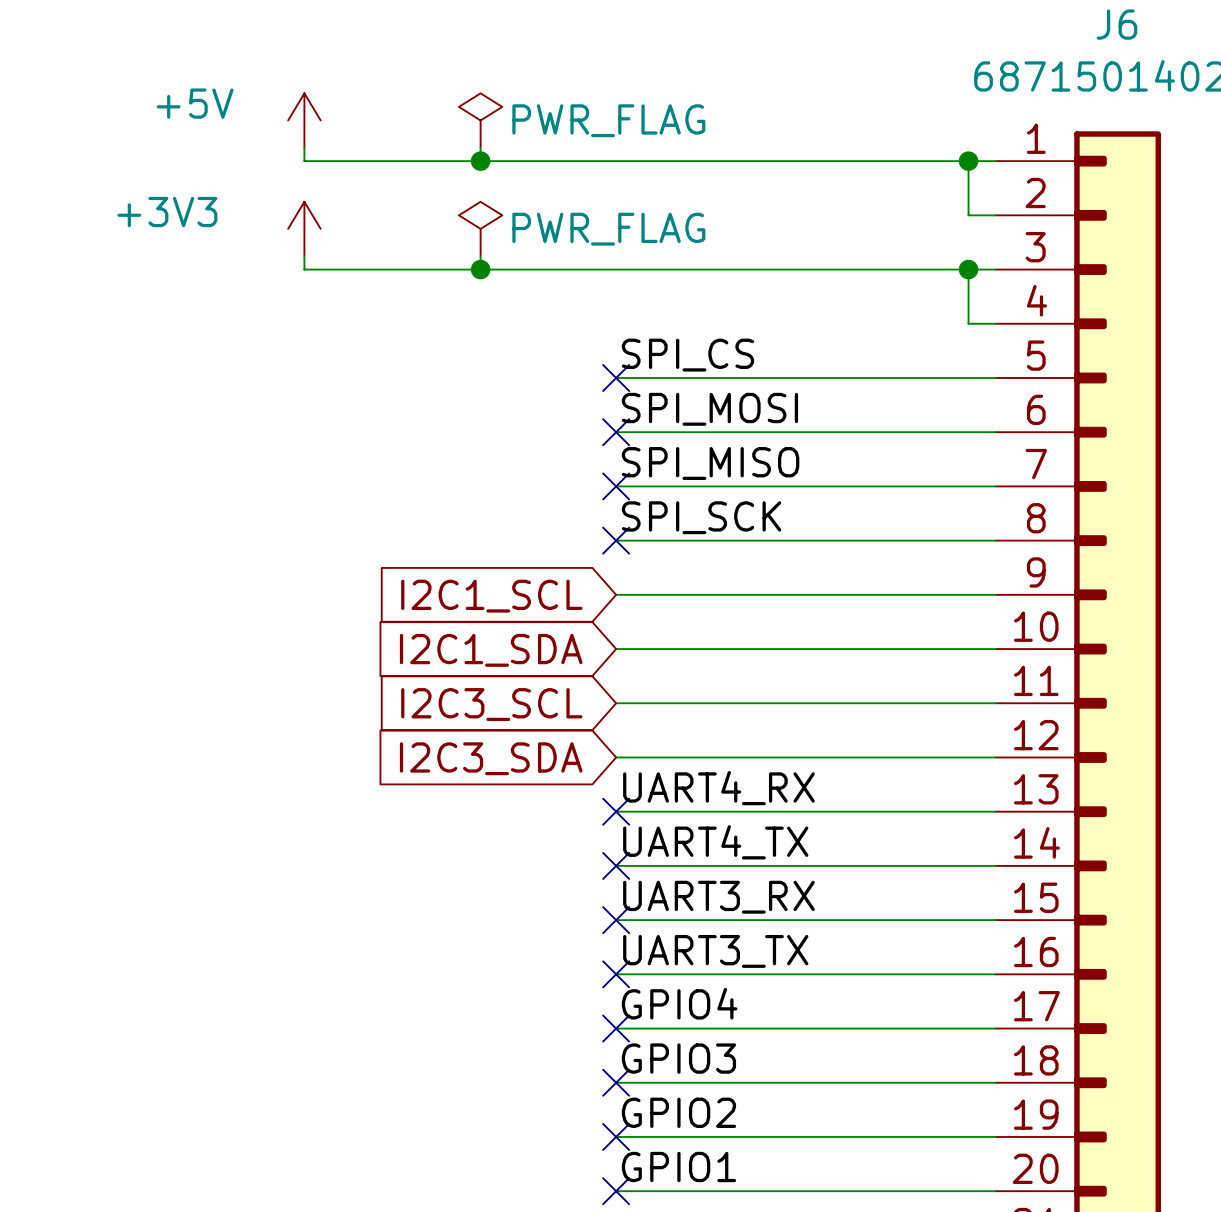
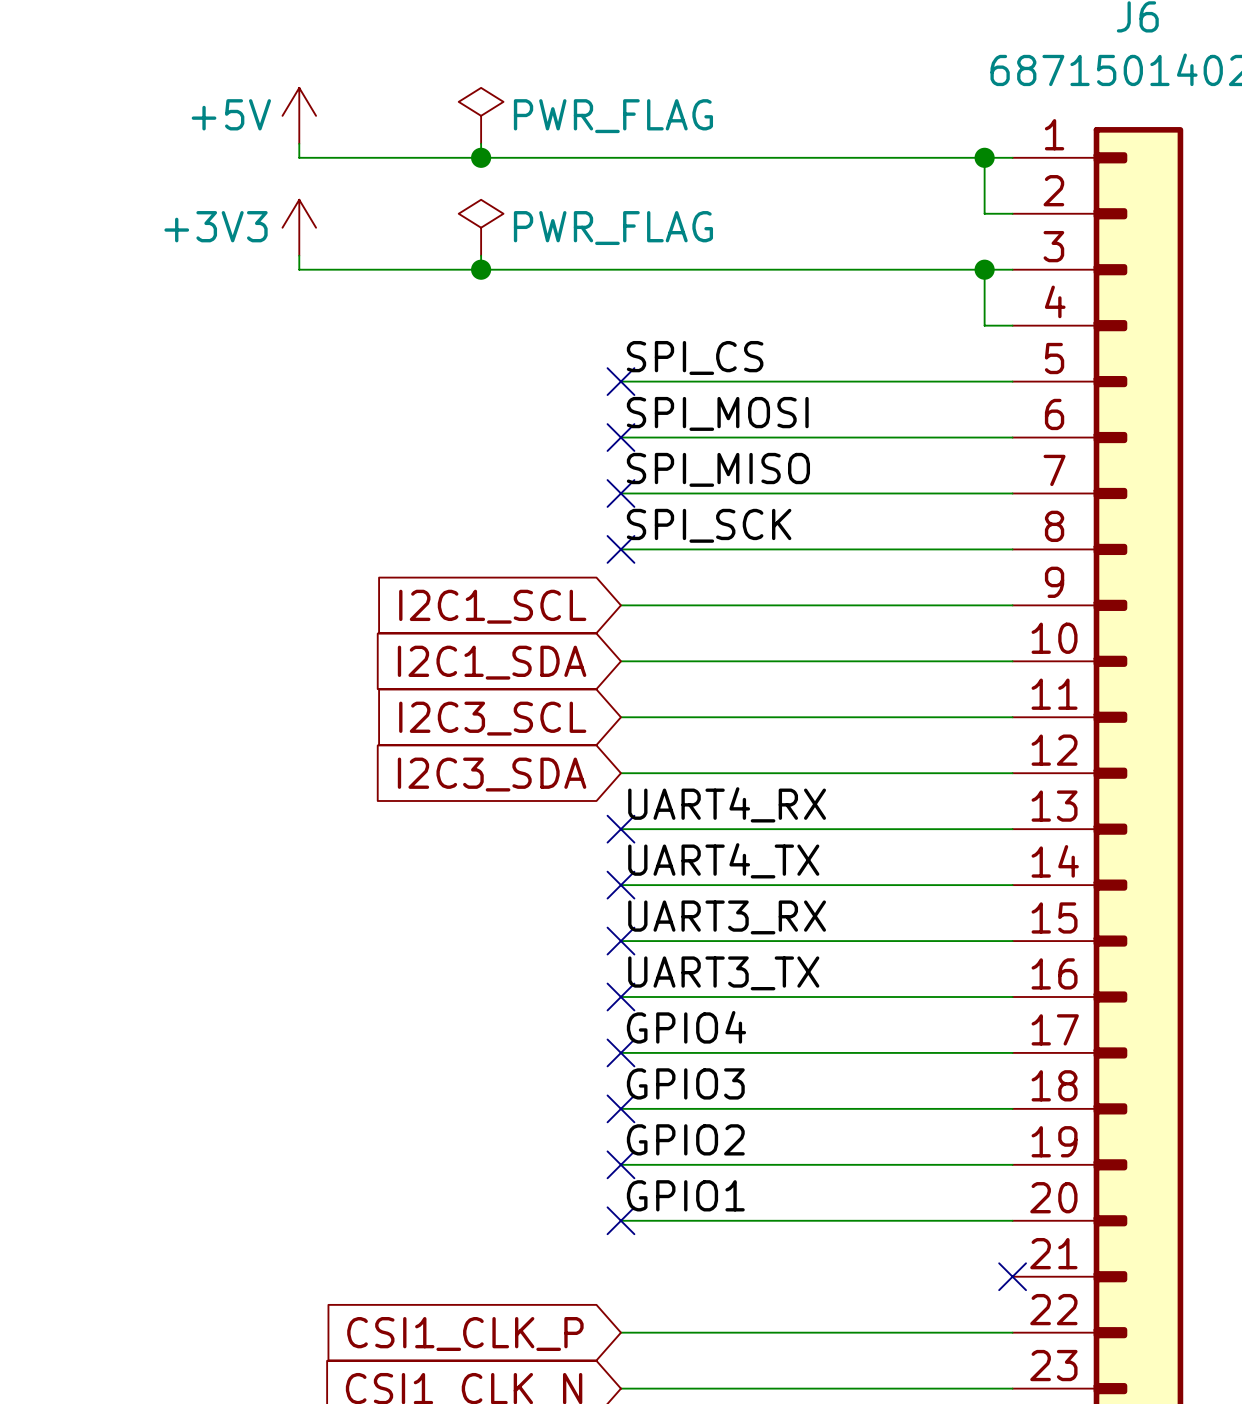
power symbol text position: +5V (195, 103) -> +5V (231, 114)
power symbol text position: +3V3 (167, 212) -> +3V3 (216, 226)

